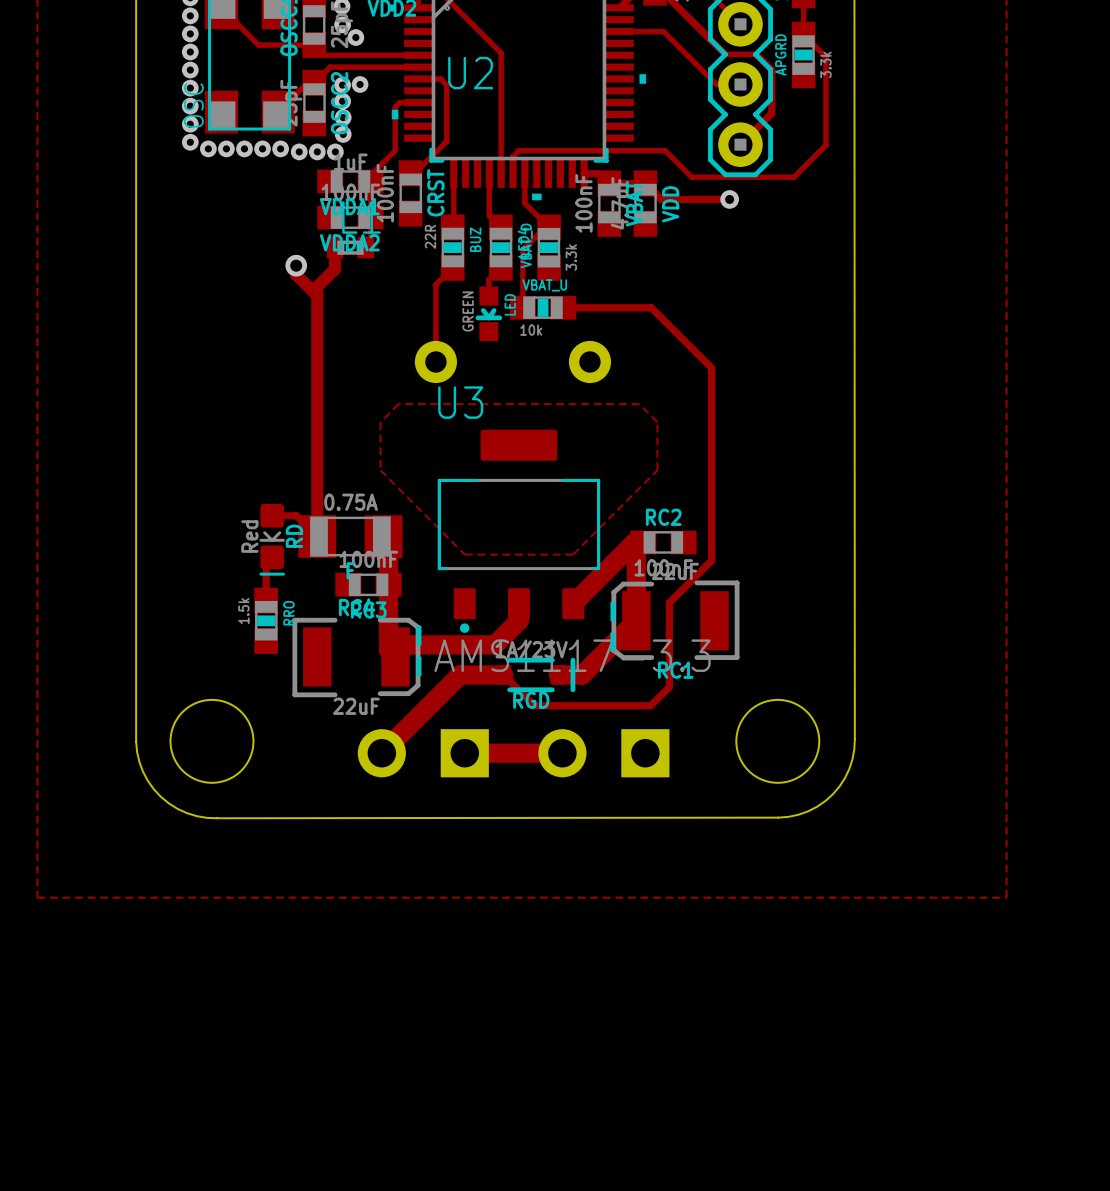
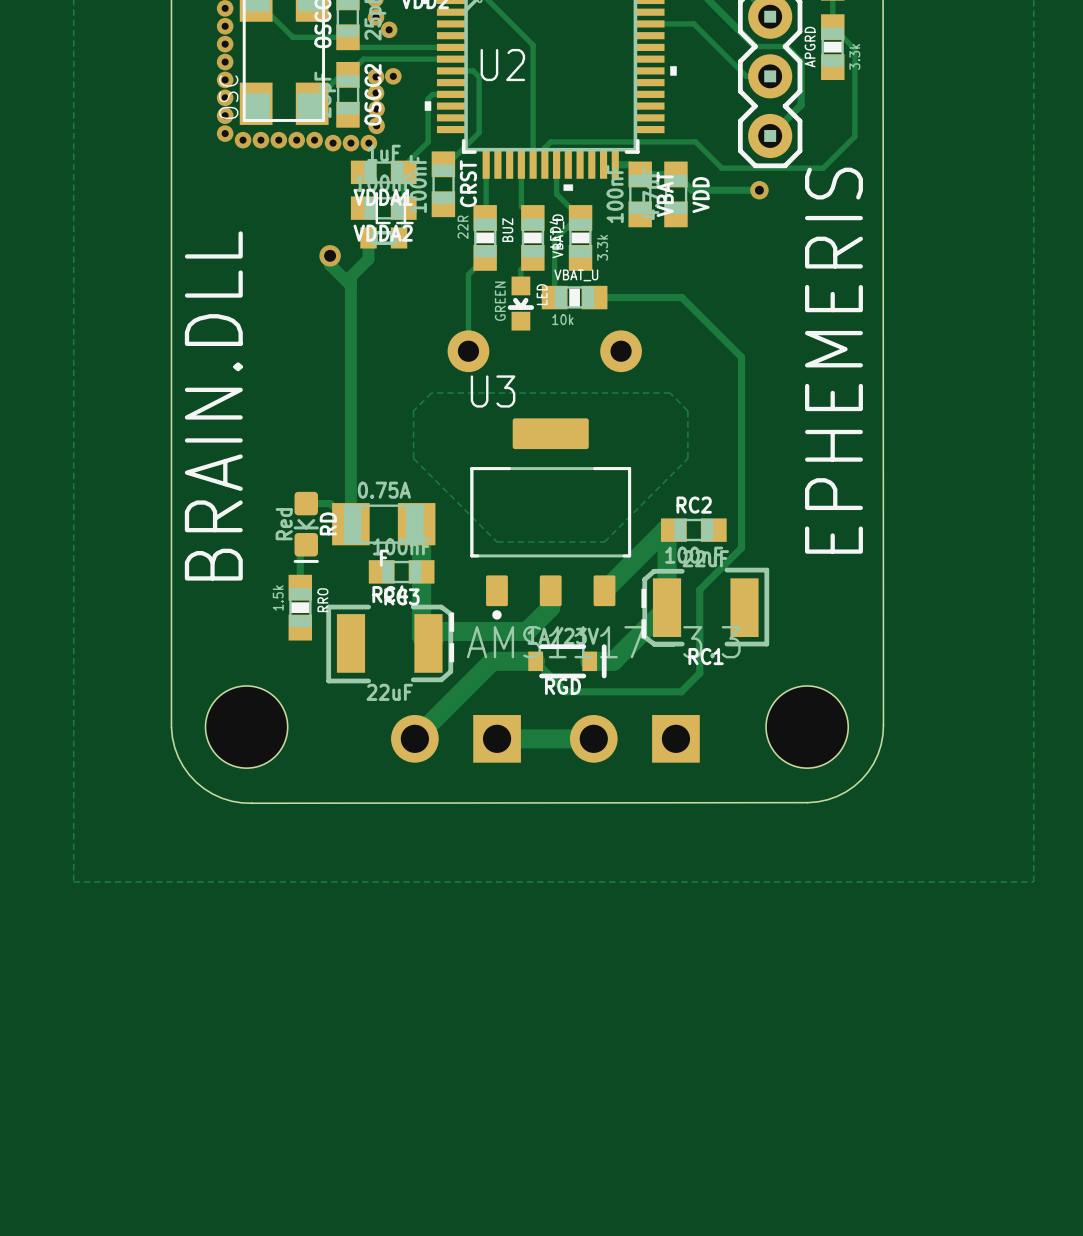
text: none -> EPHEMERIS (833, 360)
text: none -> BRAIN.DLL (213, 405)

